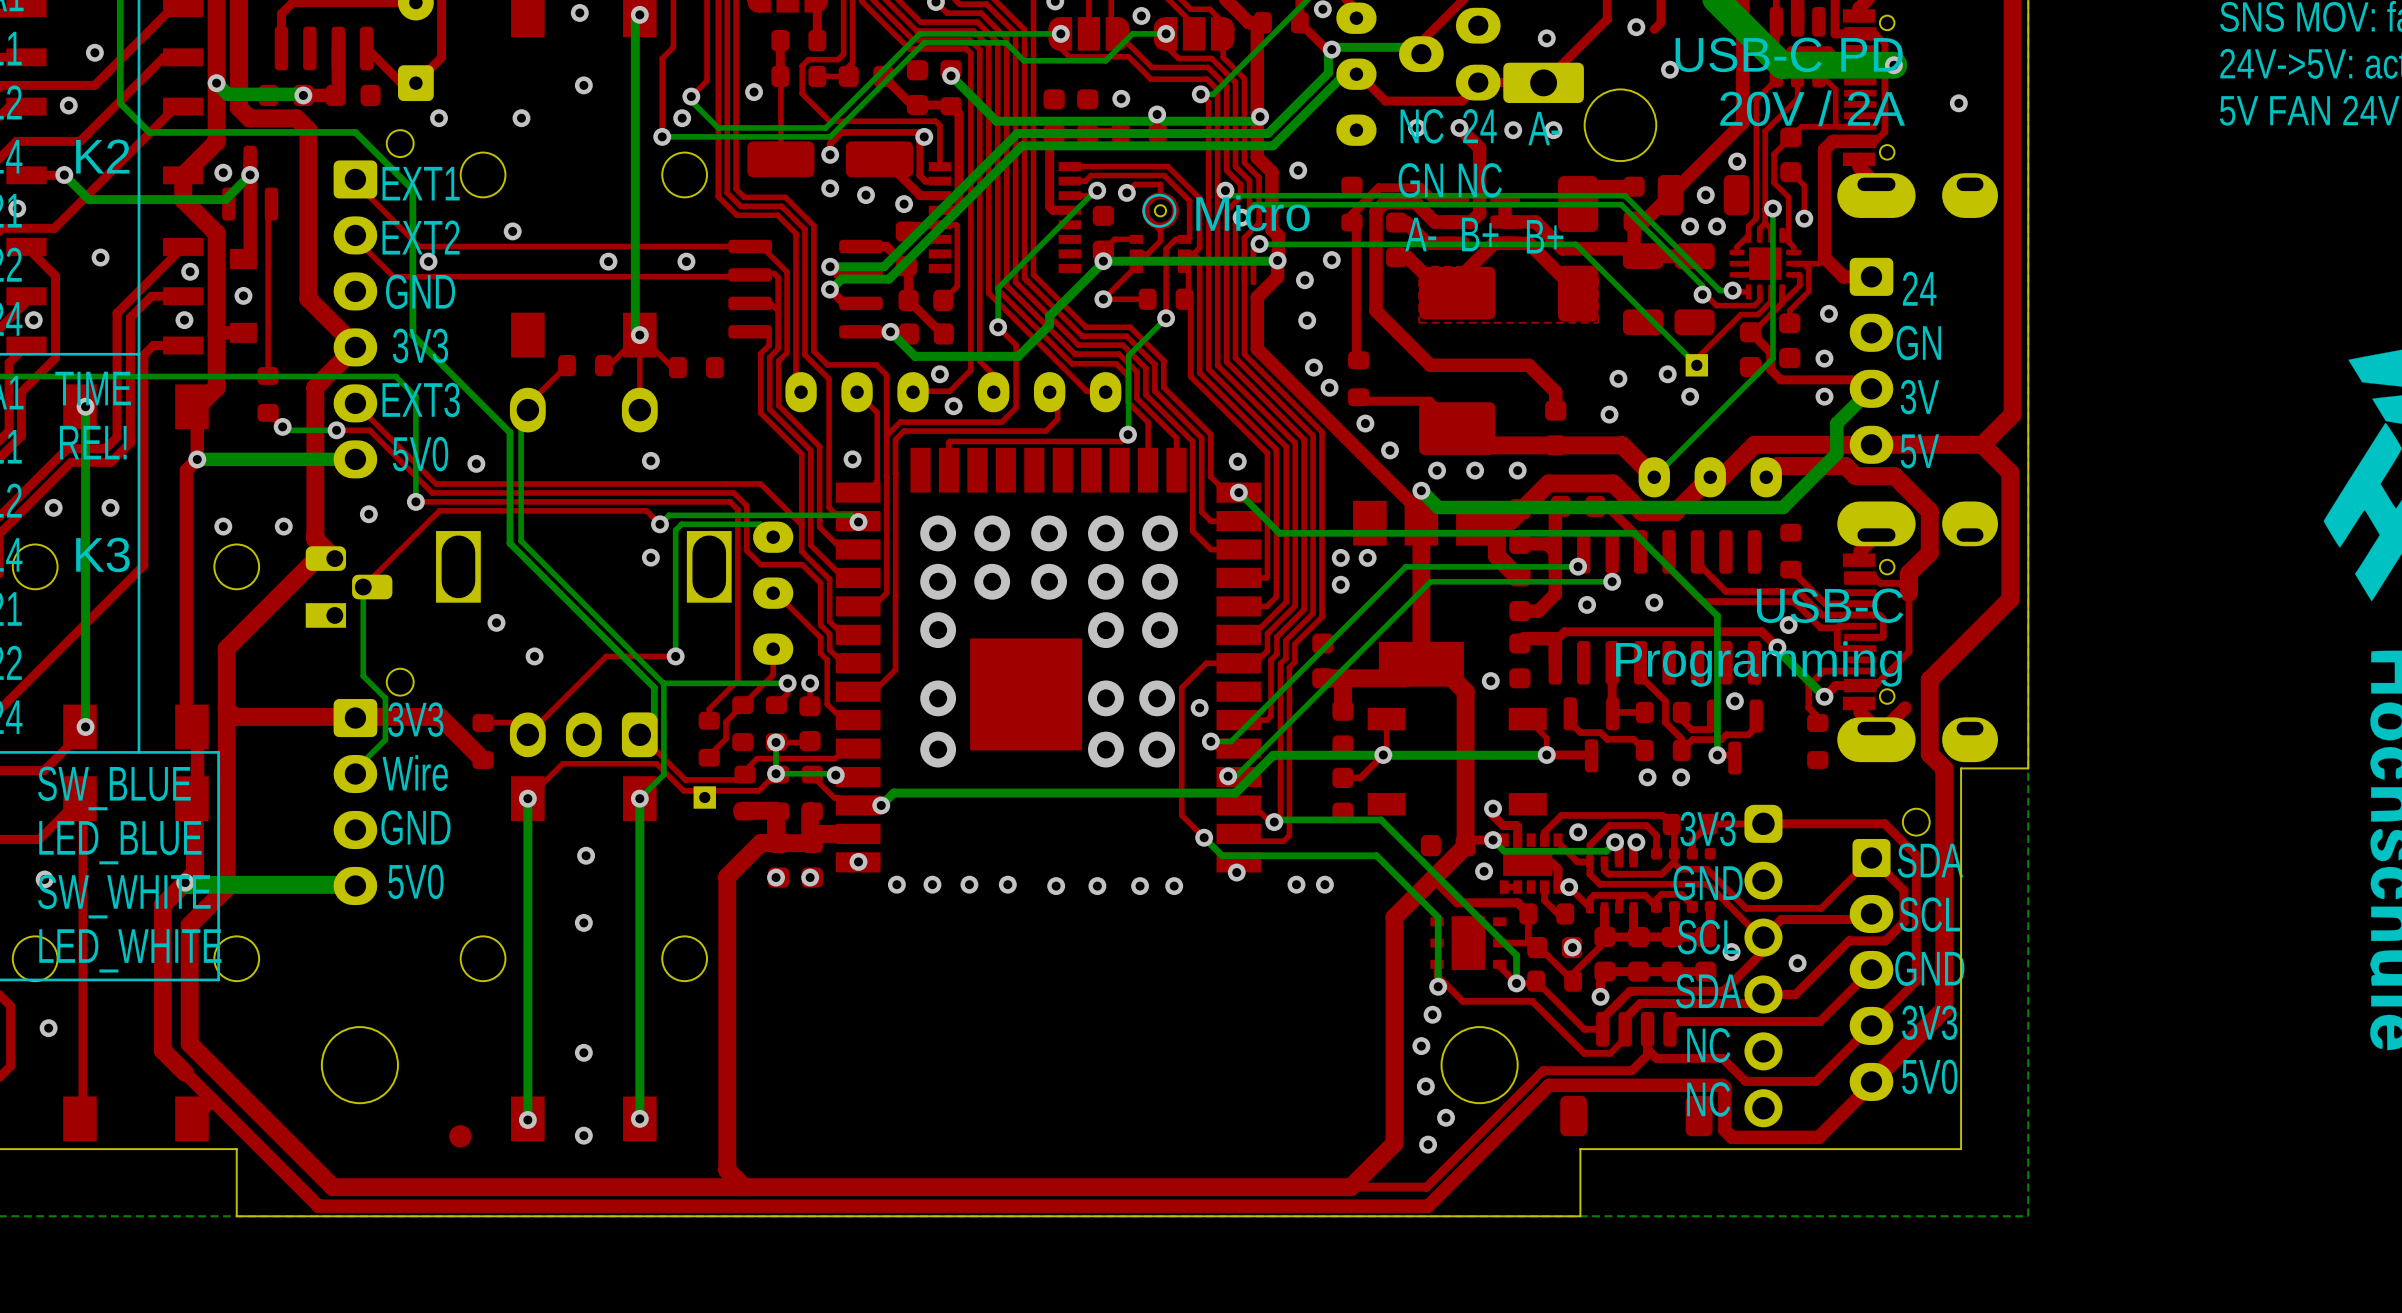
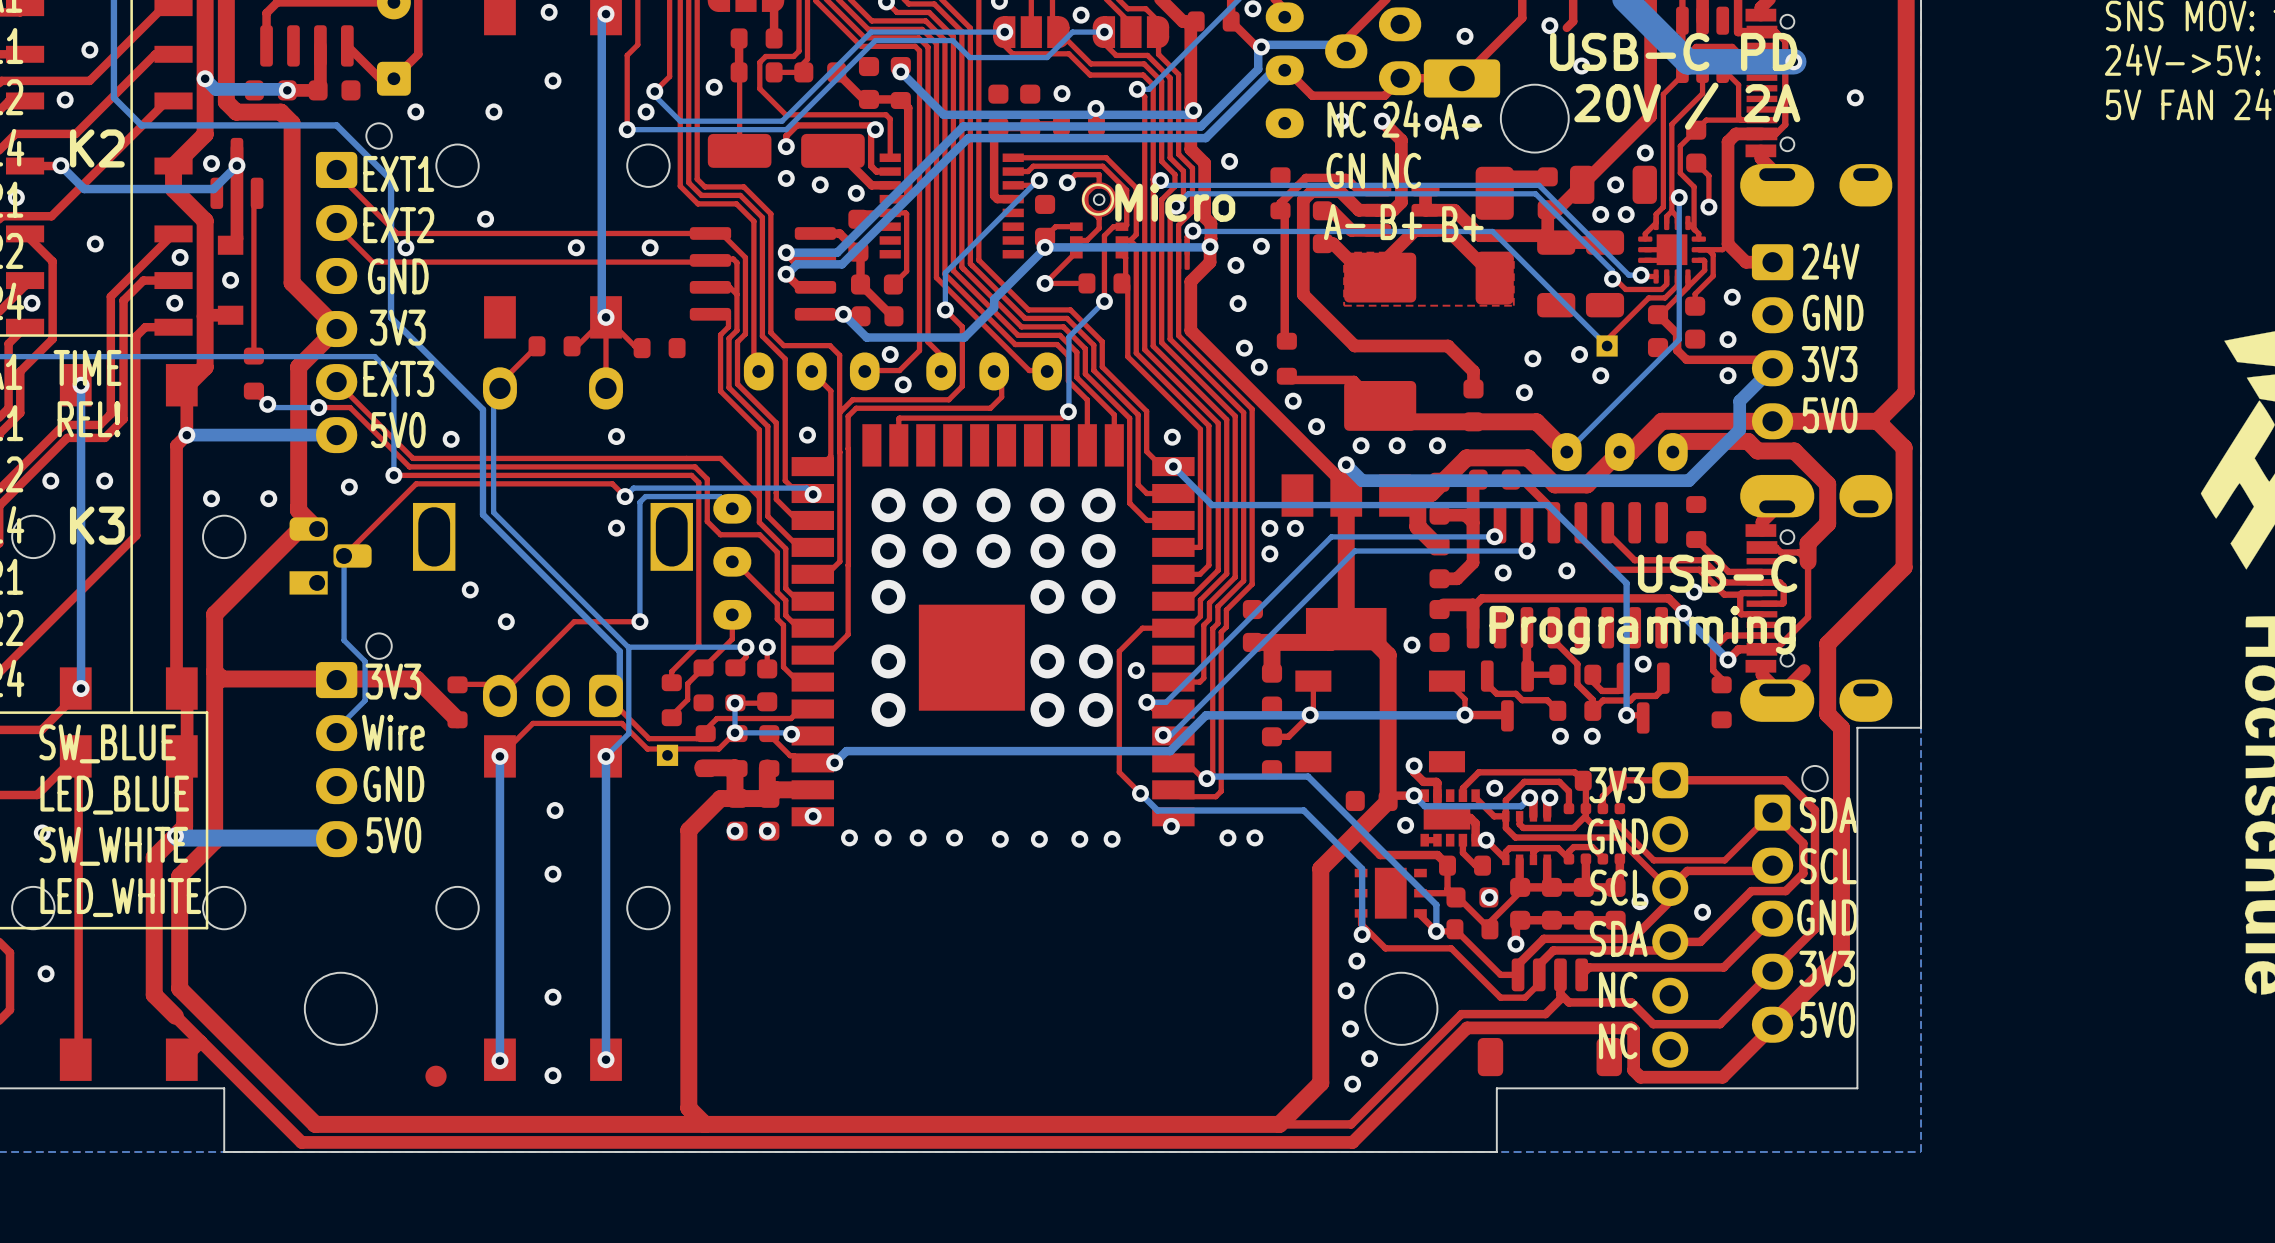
text: 24 (1919, 288) -> 24V (1830, 260)
text: GN (1918, 343) -> GND (1833, 312)
text: 3V (1919, 397) -> 3V3 (1829, 364)
text: 5V (1919, 451) -> 5V0 (1830, 415)

